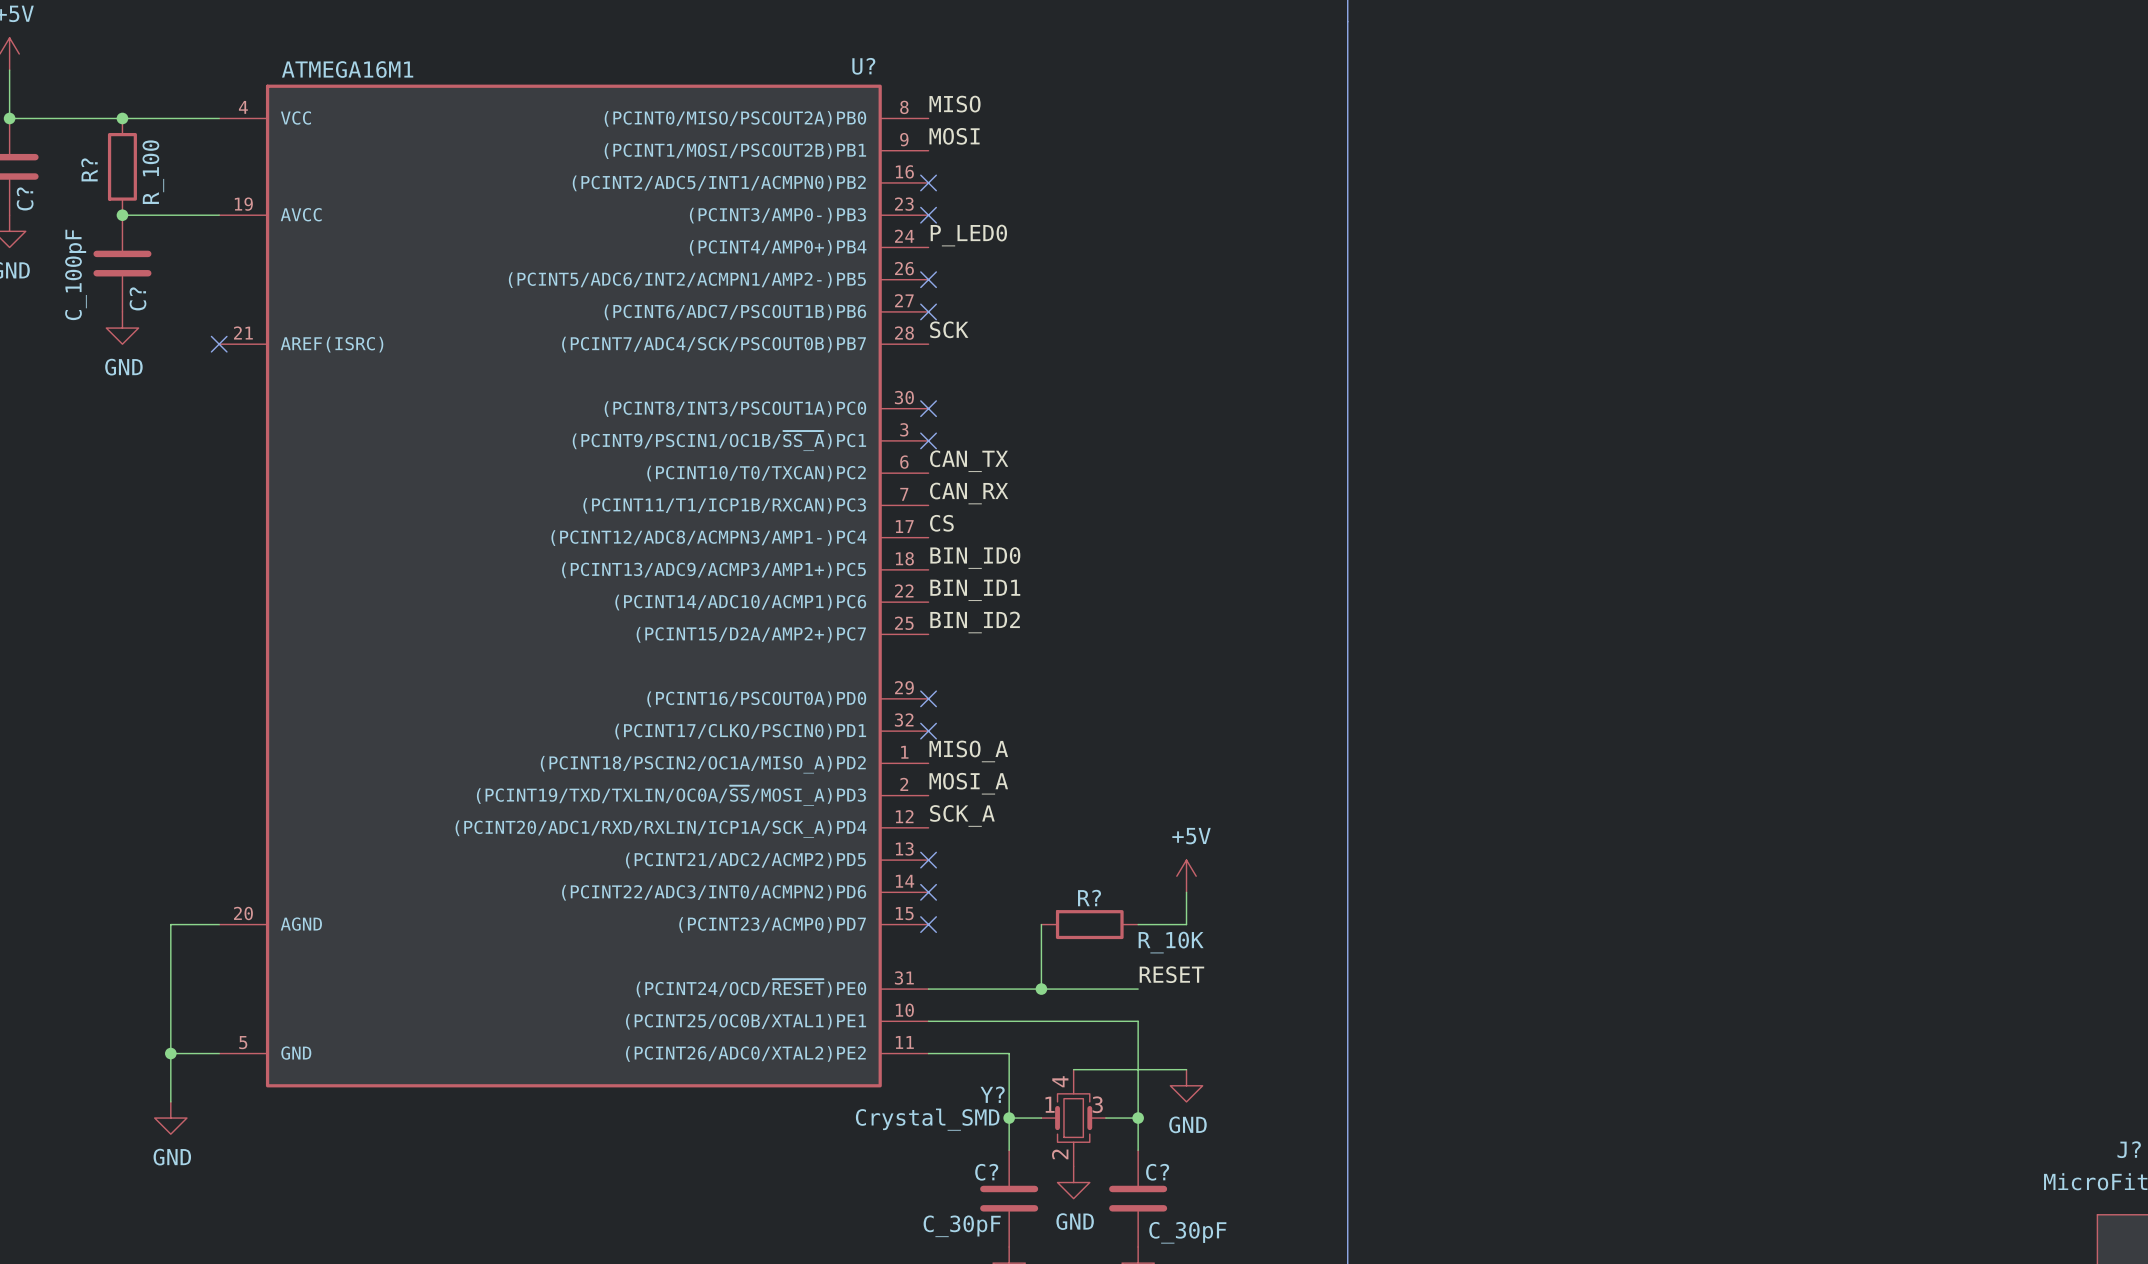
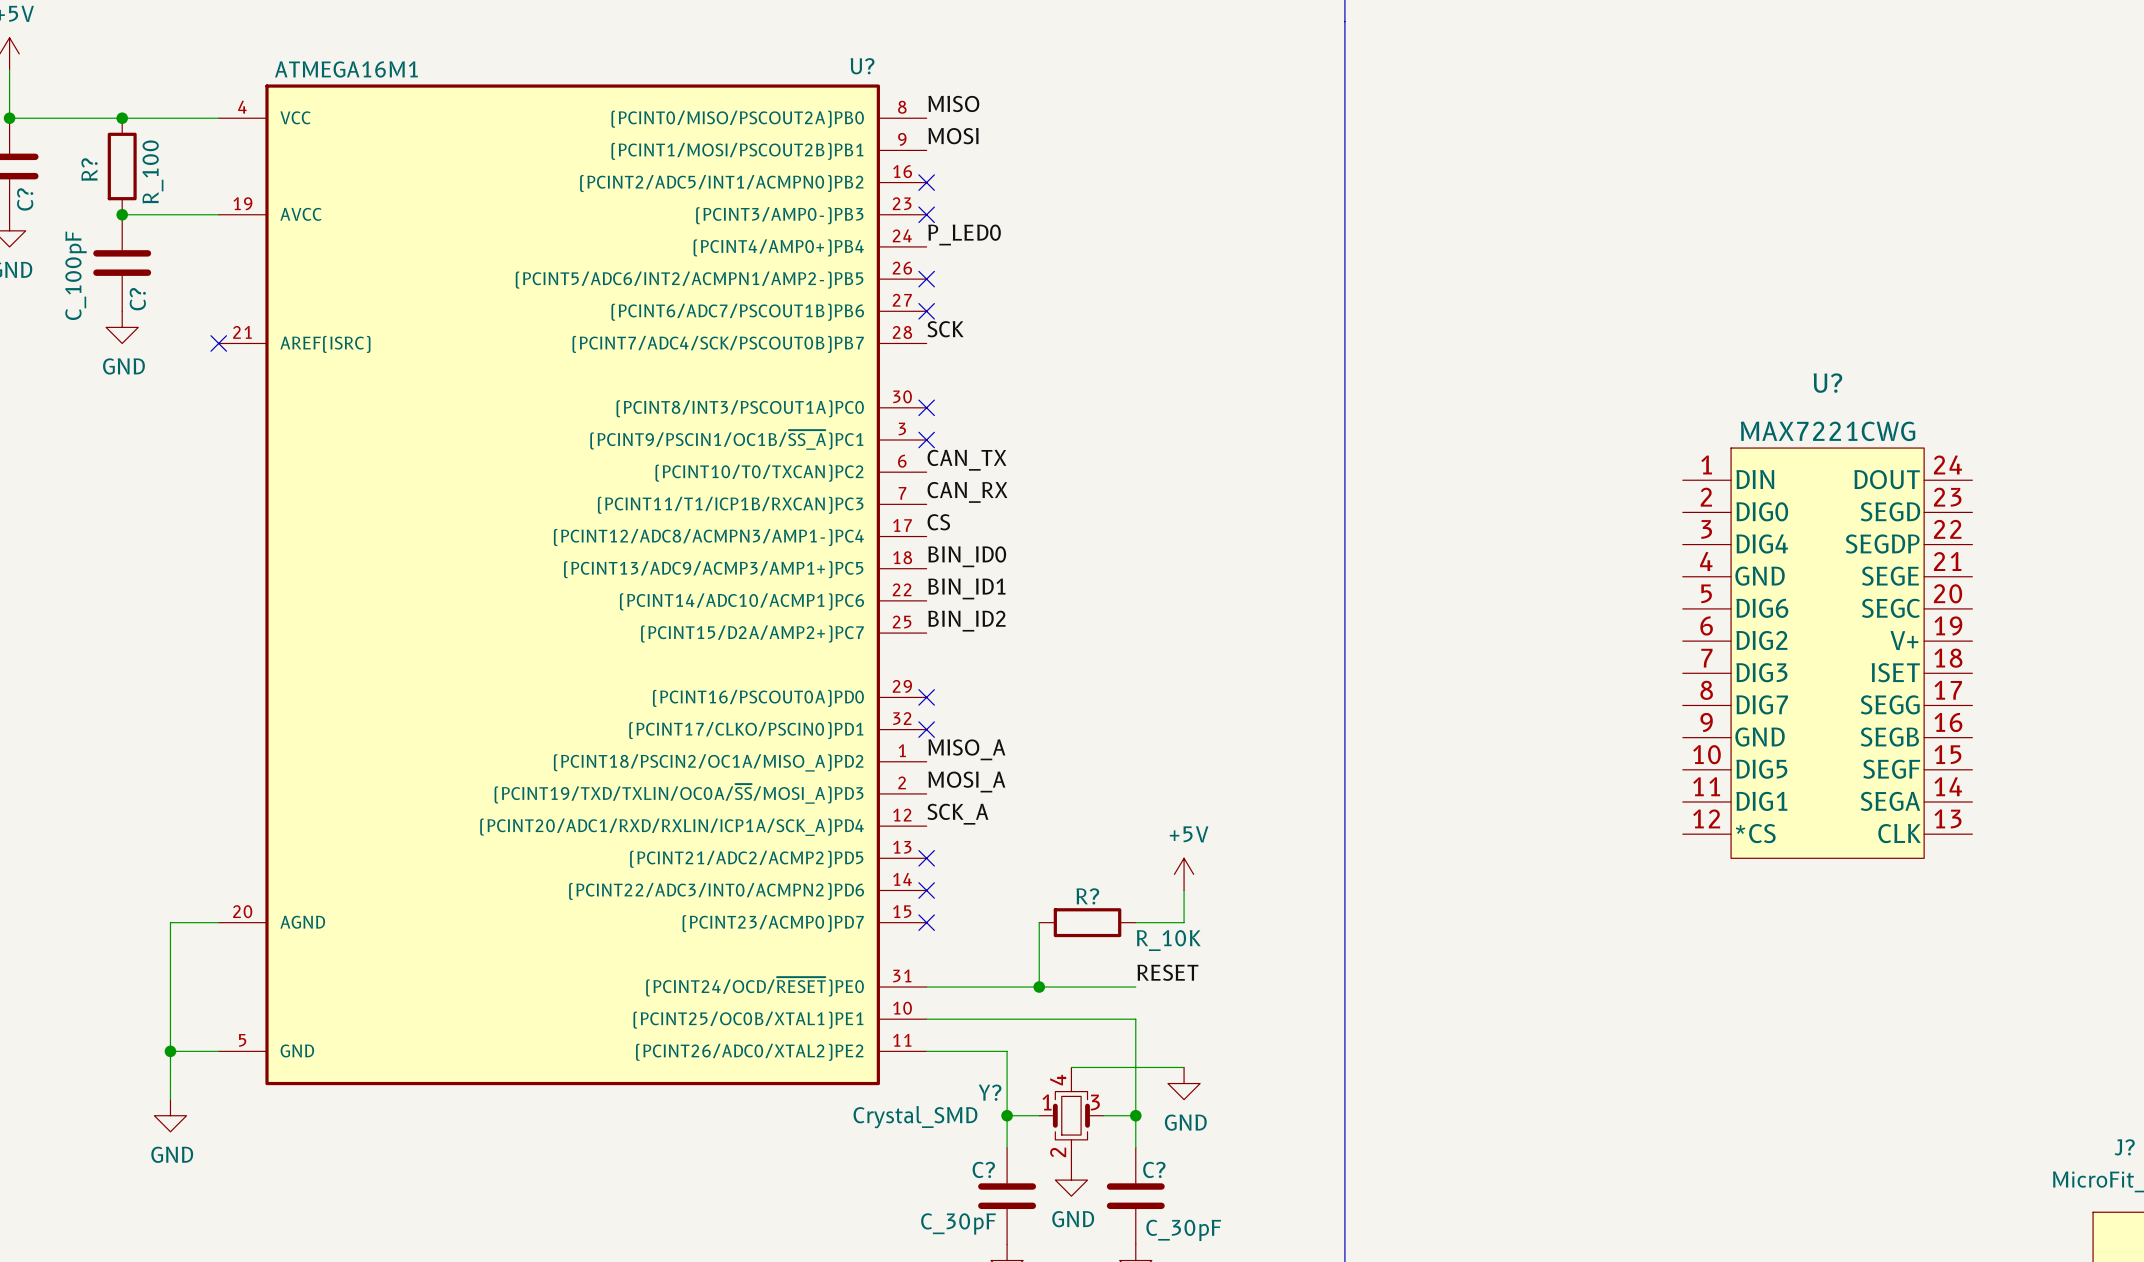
U?: none -> MAX7221CWG (1827, 653)

